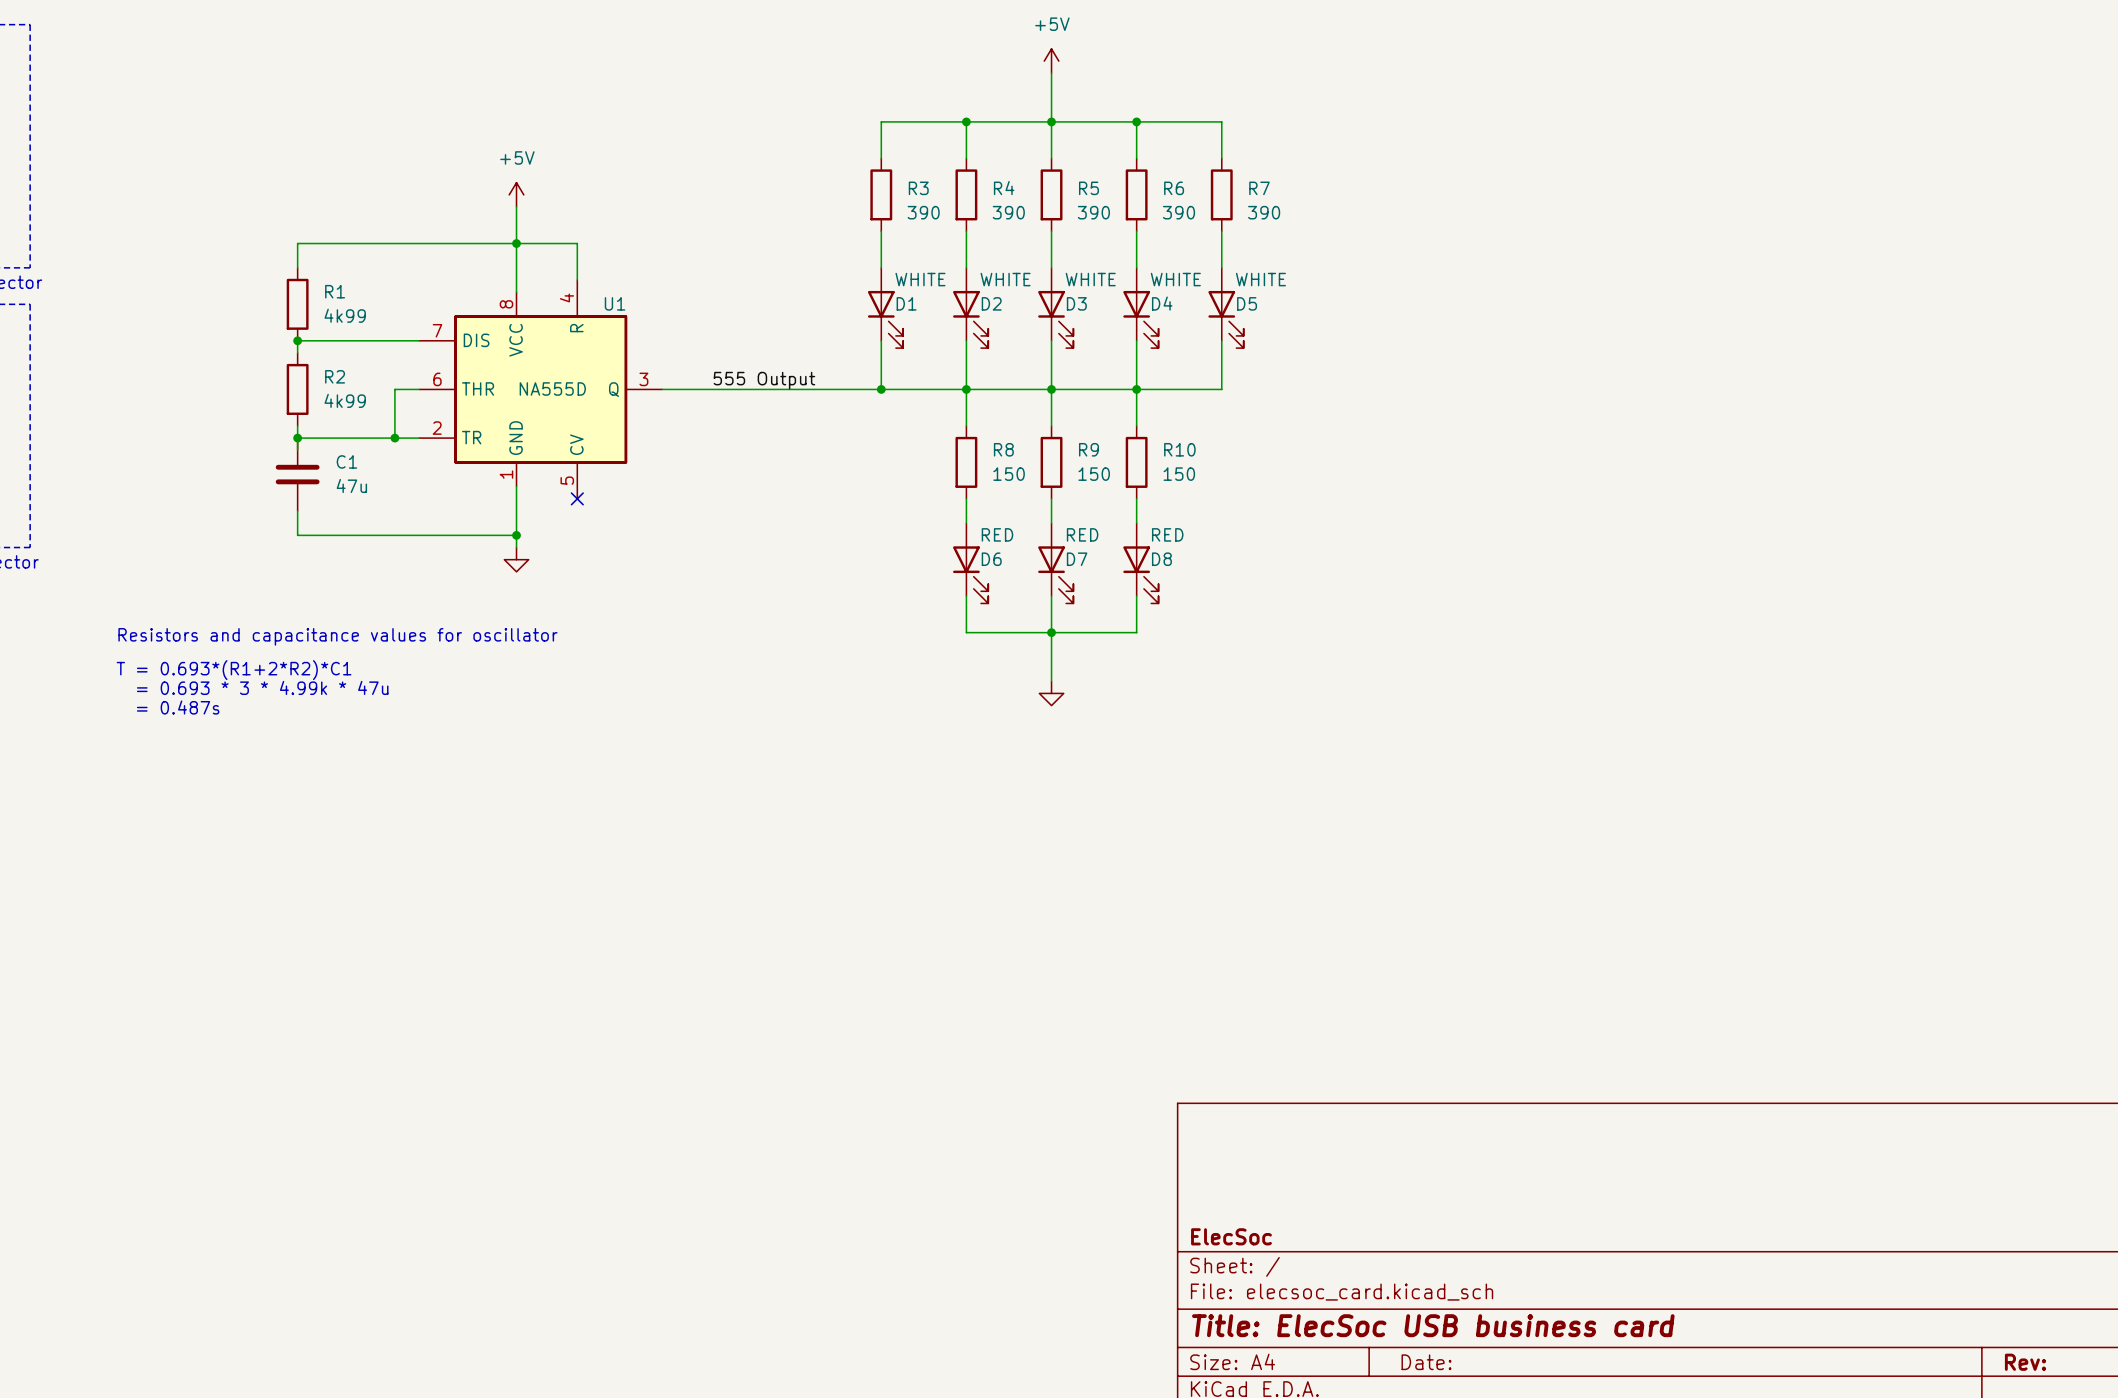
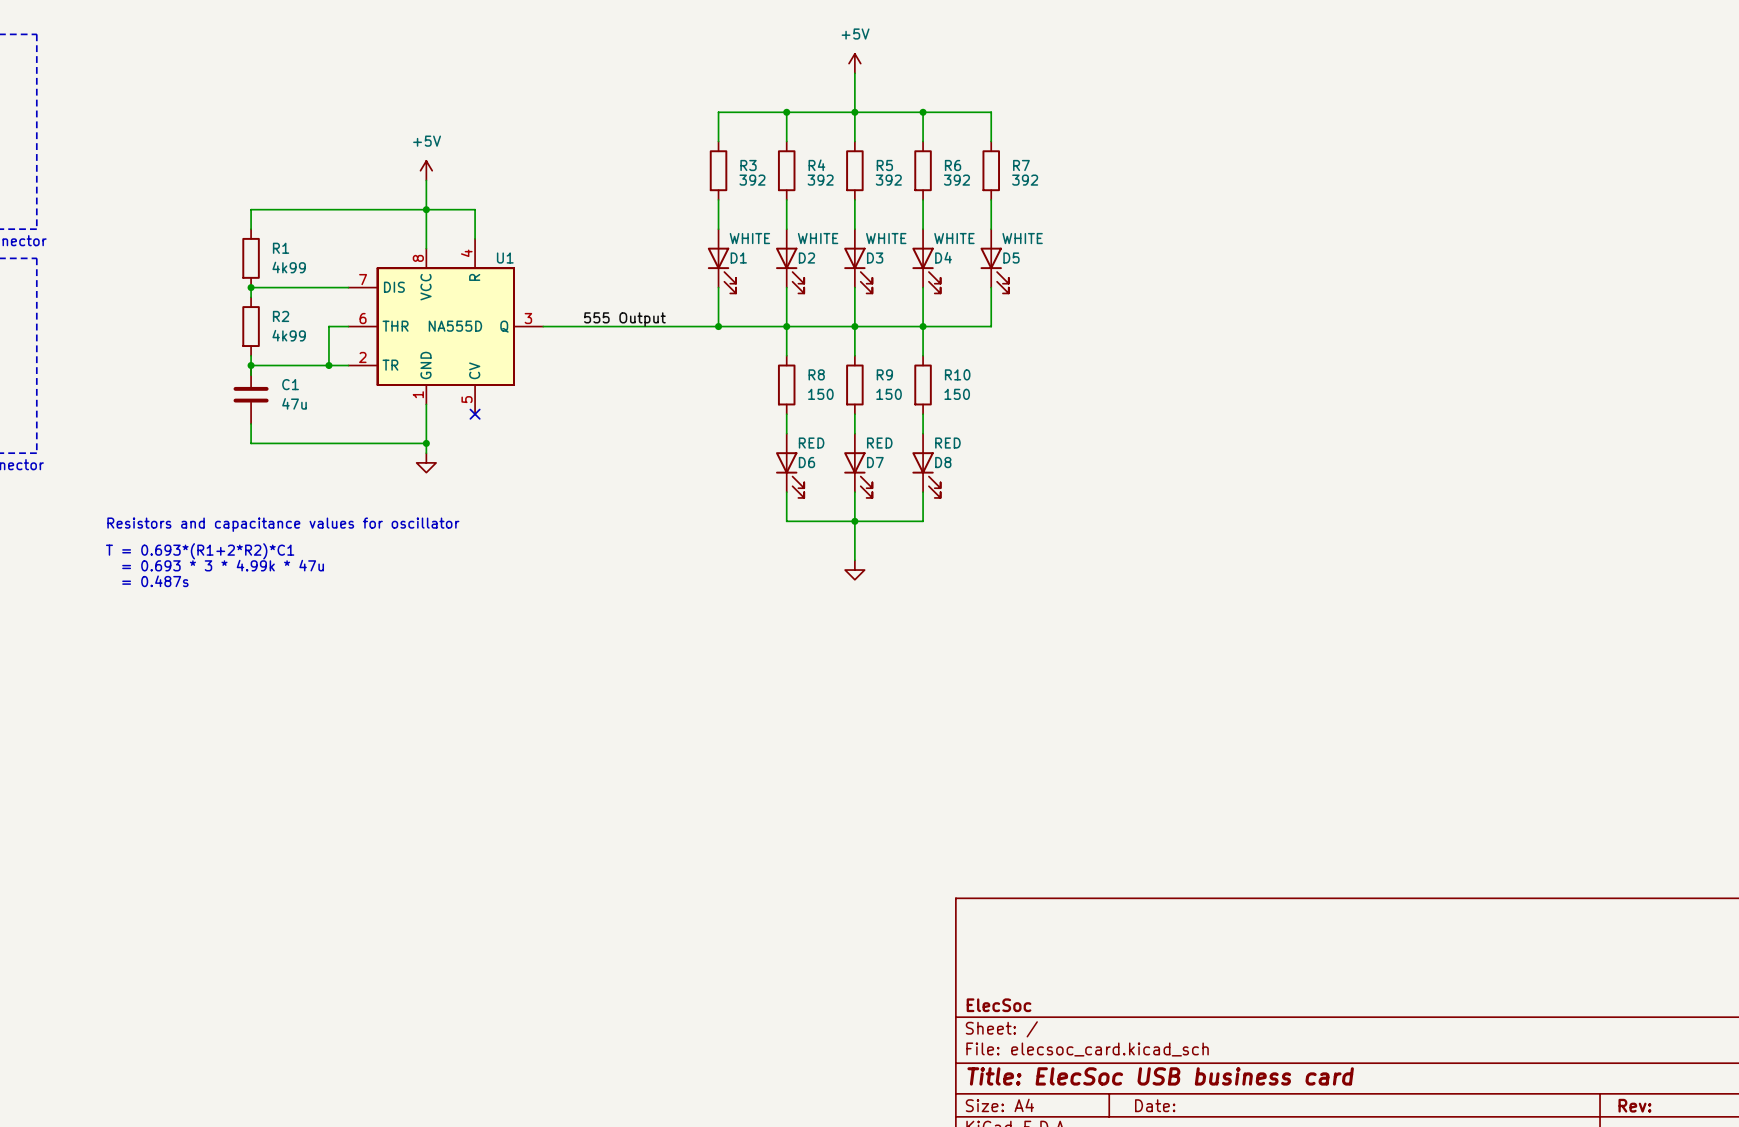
R3 value: 390 (923, 212) -> 392 (752, 180)
R4 value: 390 (1008, 212) -> 392 (820, 180)
R5 value: 390 (1093, 212) -> 392 (888, 180)
R6 value: 390 (1179, 212) -> 392 (956, 180)
R7 value: 390 (1264, 212) -> 392 (1025, 180)

